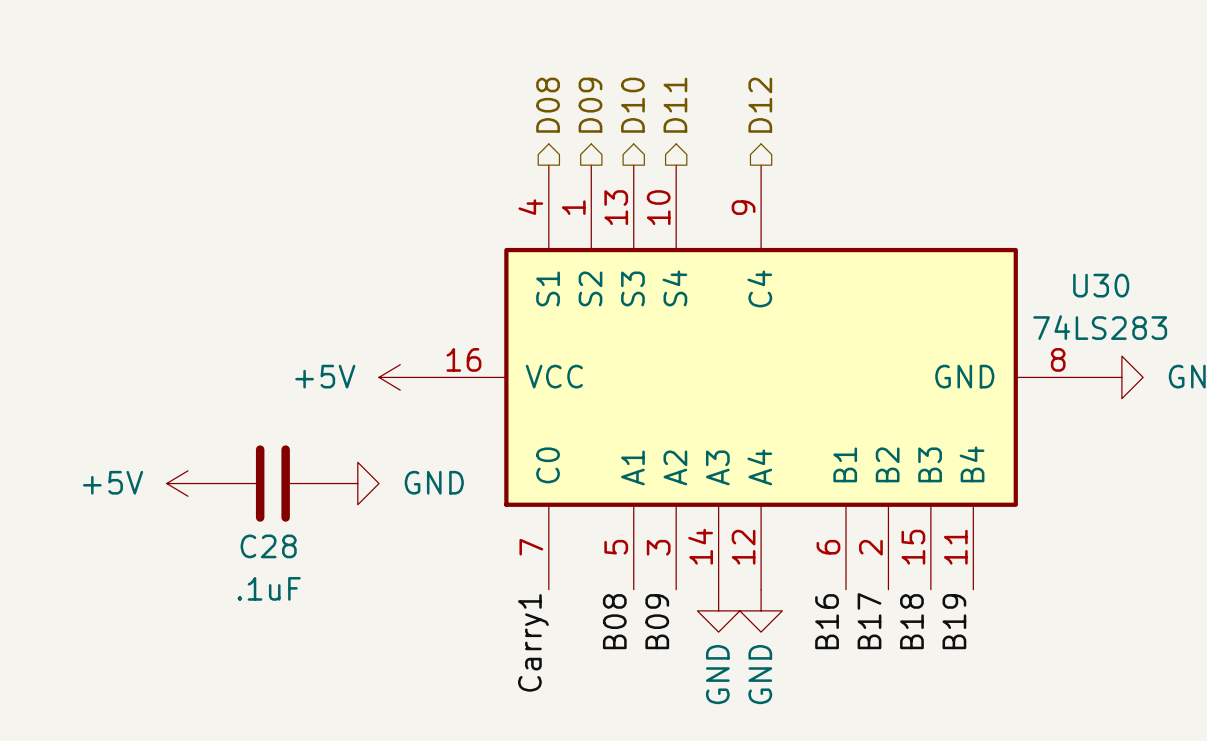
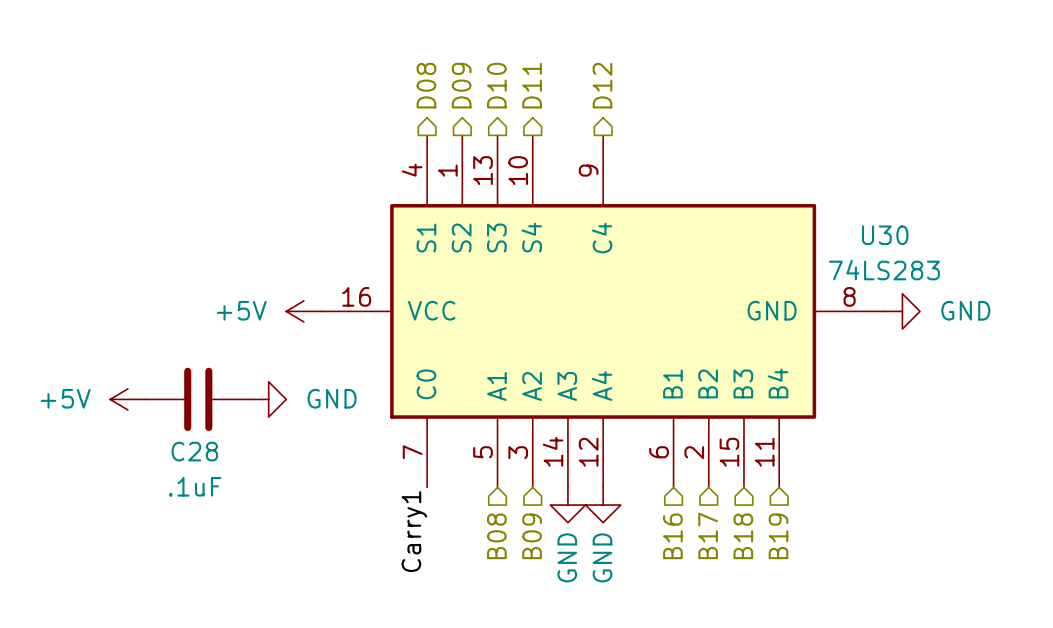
label: B08 (614, 621) -> none
label: B09 (657, 621) -> none
label: B16 (827, 621) -> none
label: B17 (869, 621) -> none
label: B18 (911, 621) -> none
label: B19 (954, 621) -> none
hierarchical label: none -> B08 (496, 536)
hierarchical label: none -> B09 (532, 536)
hierarchical label: none -> B16 (672, 536)
hierarchical label: none -> B17 (708, 535)
hierarchical label: none -> B18 (743, 536)
hierarchical label: none -> B19 (778, 536)

